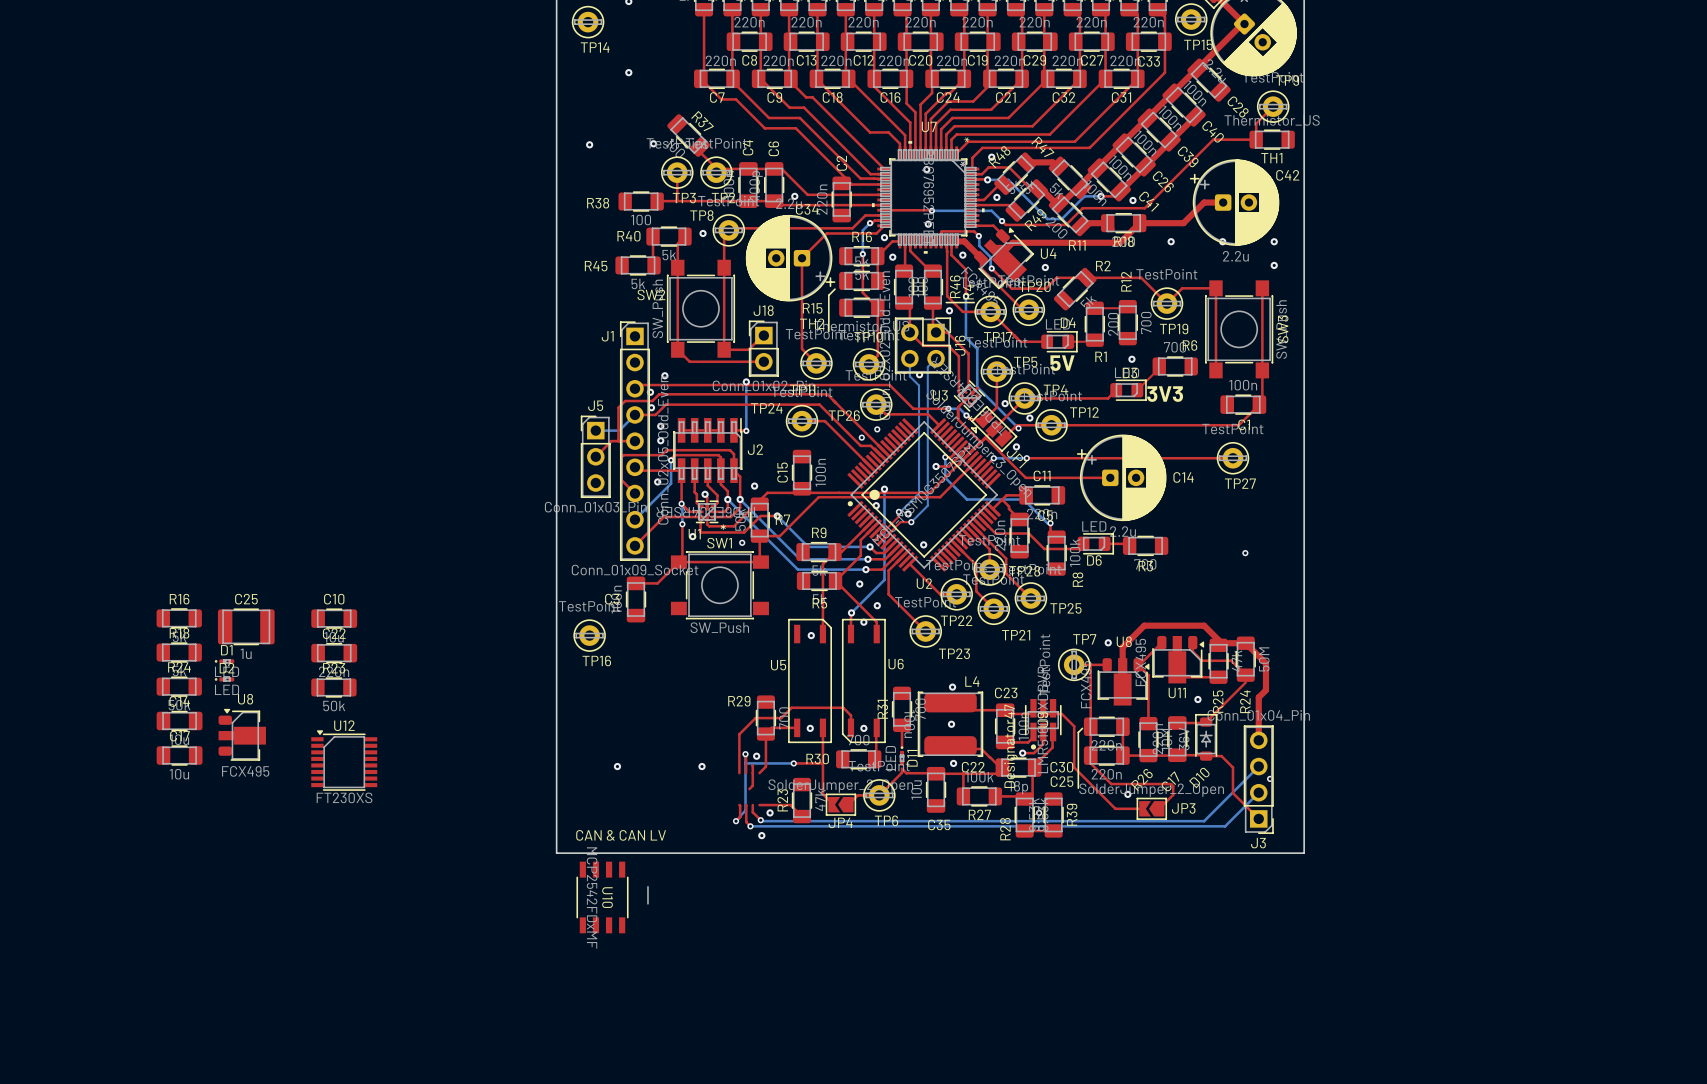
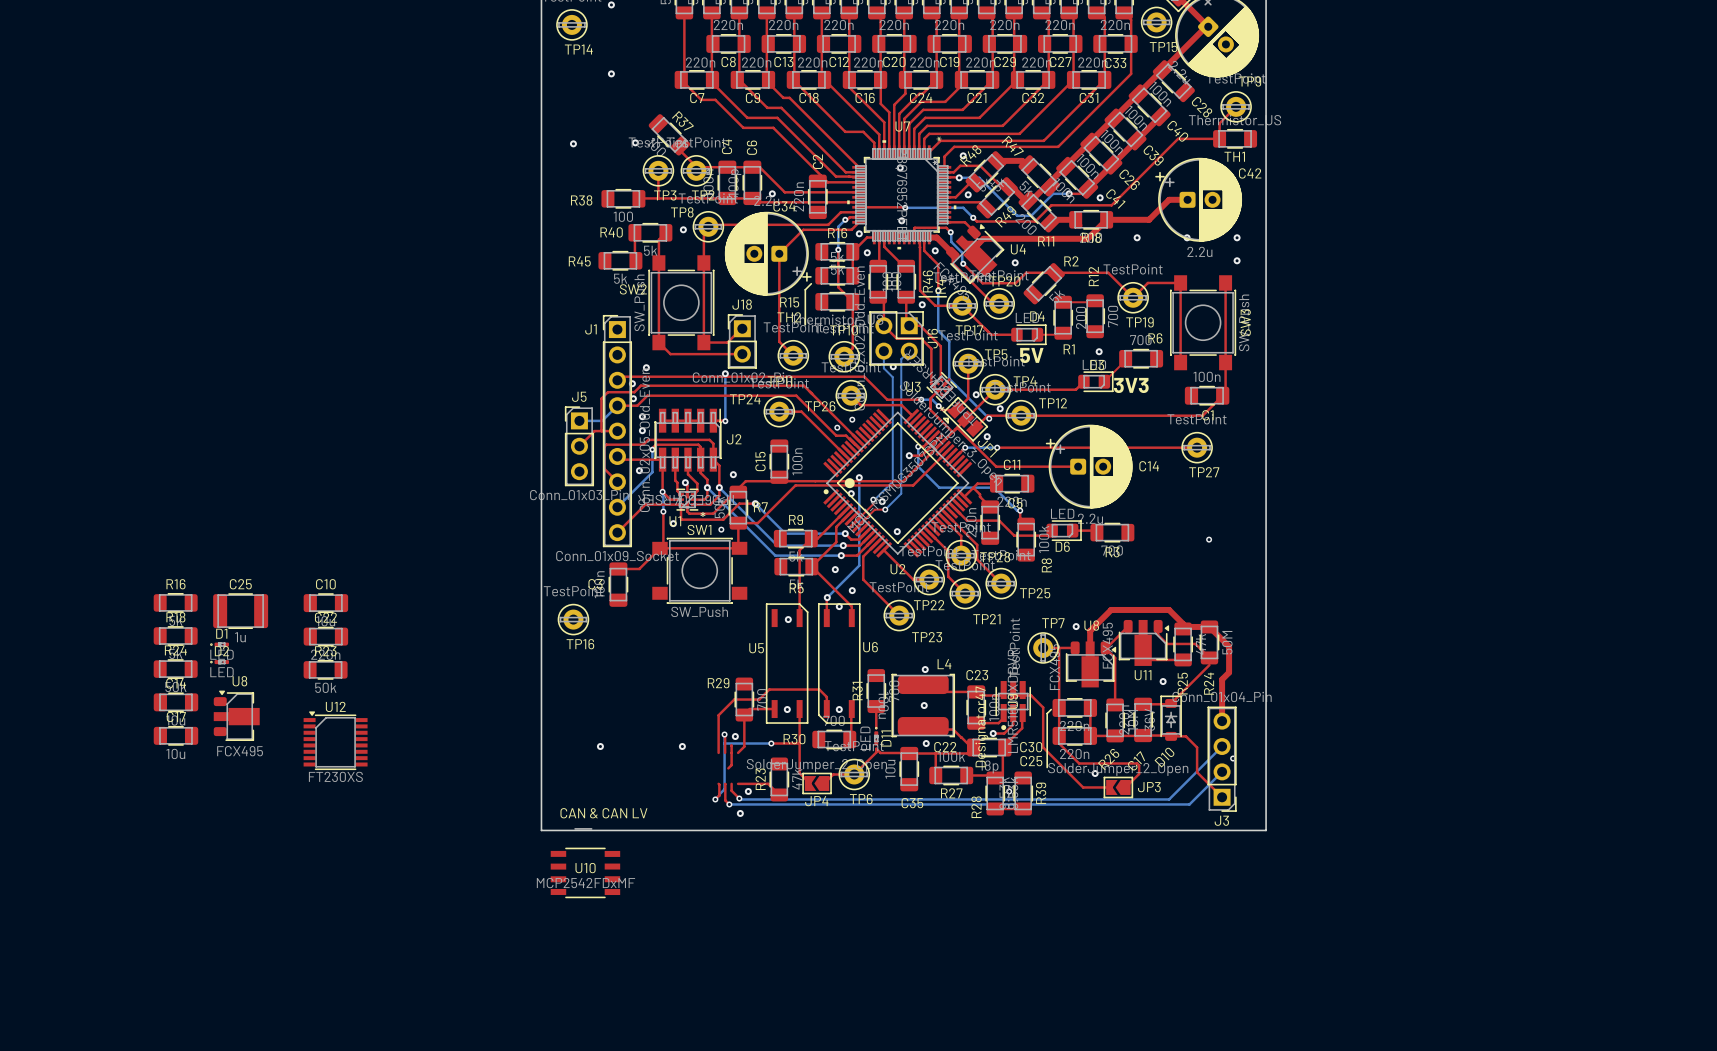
U10 rotation: 0° (612, 897) -> 90° counterclockwise (585, 863)

